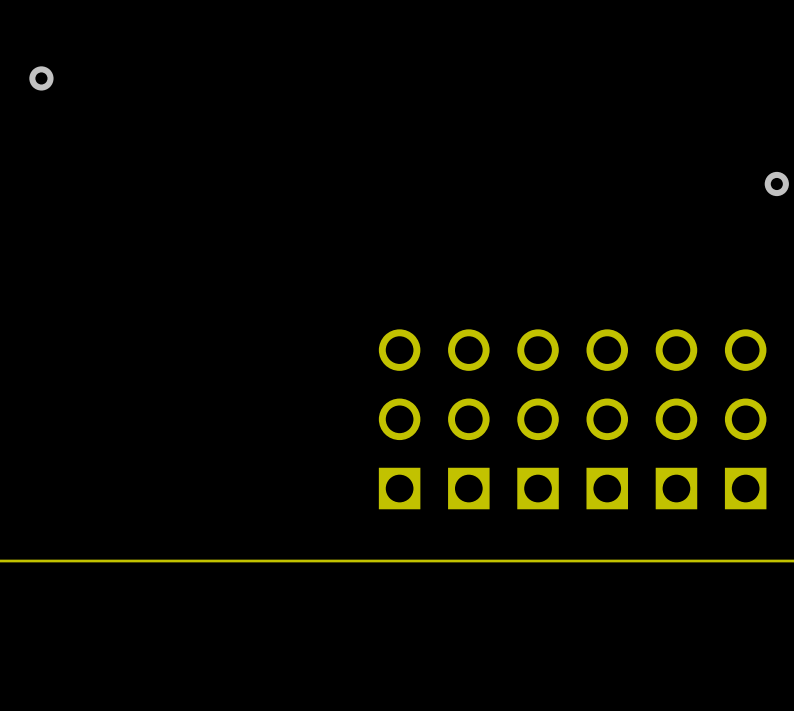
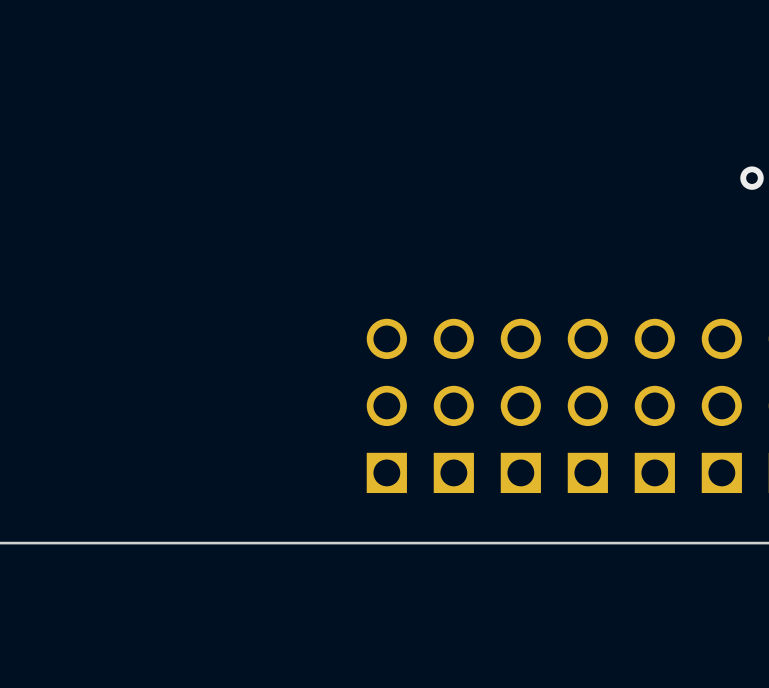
via: (41, 78) -> none

